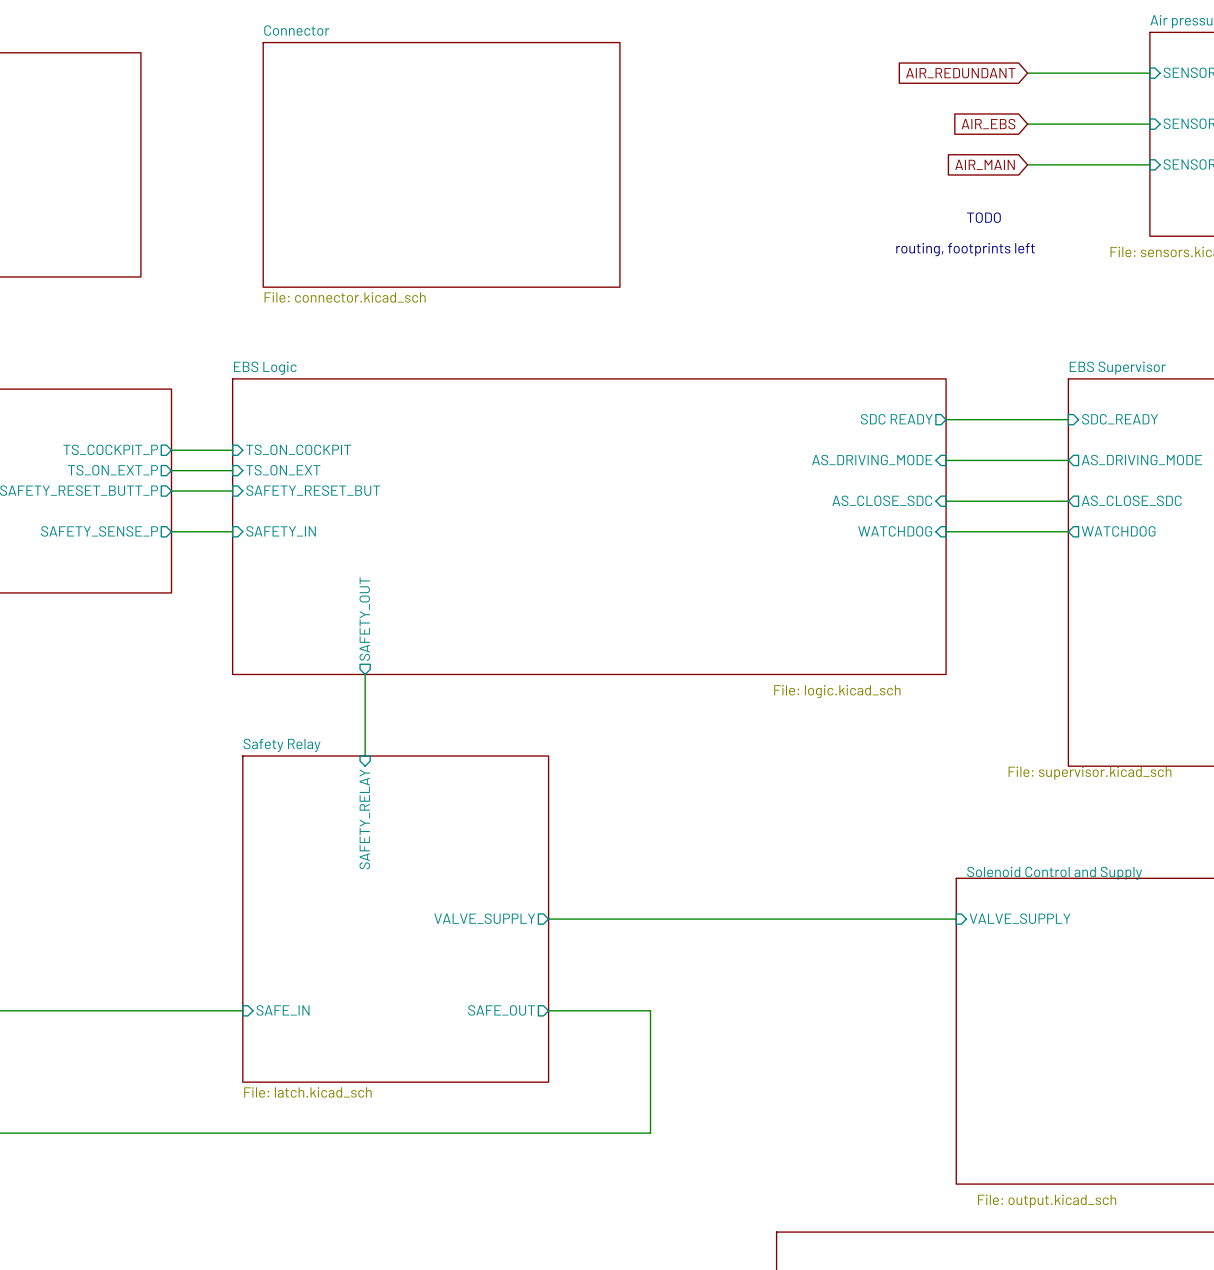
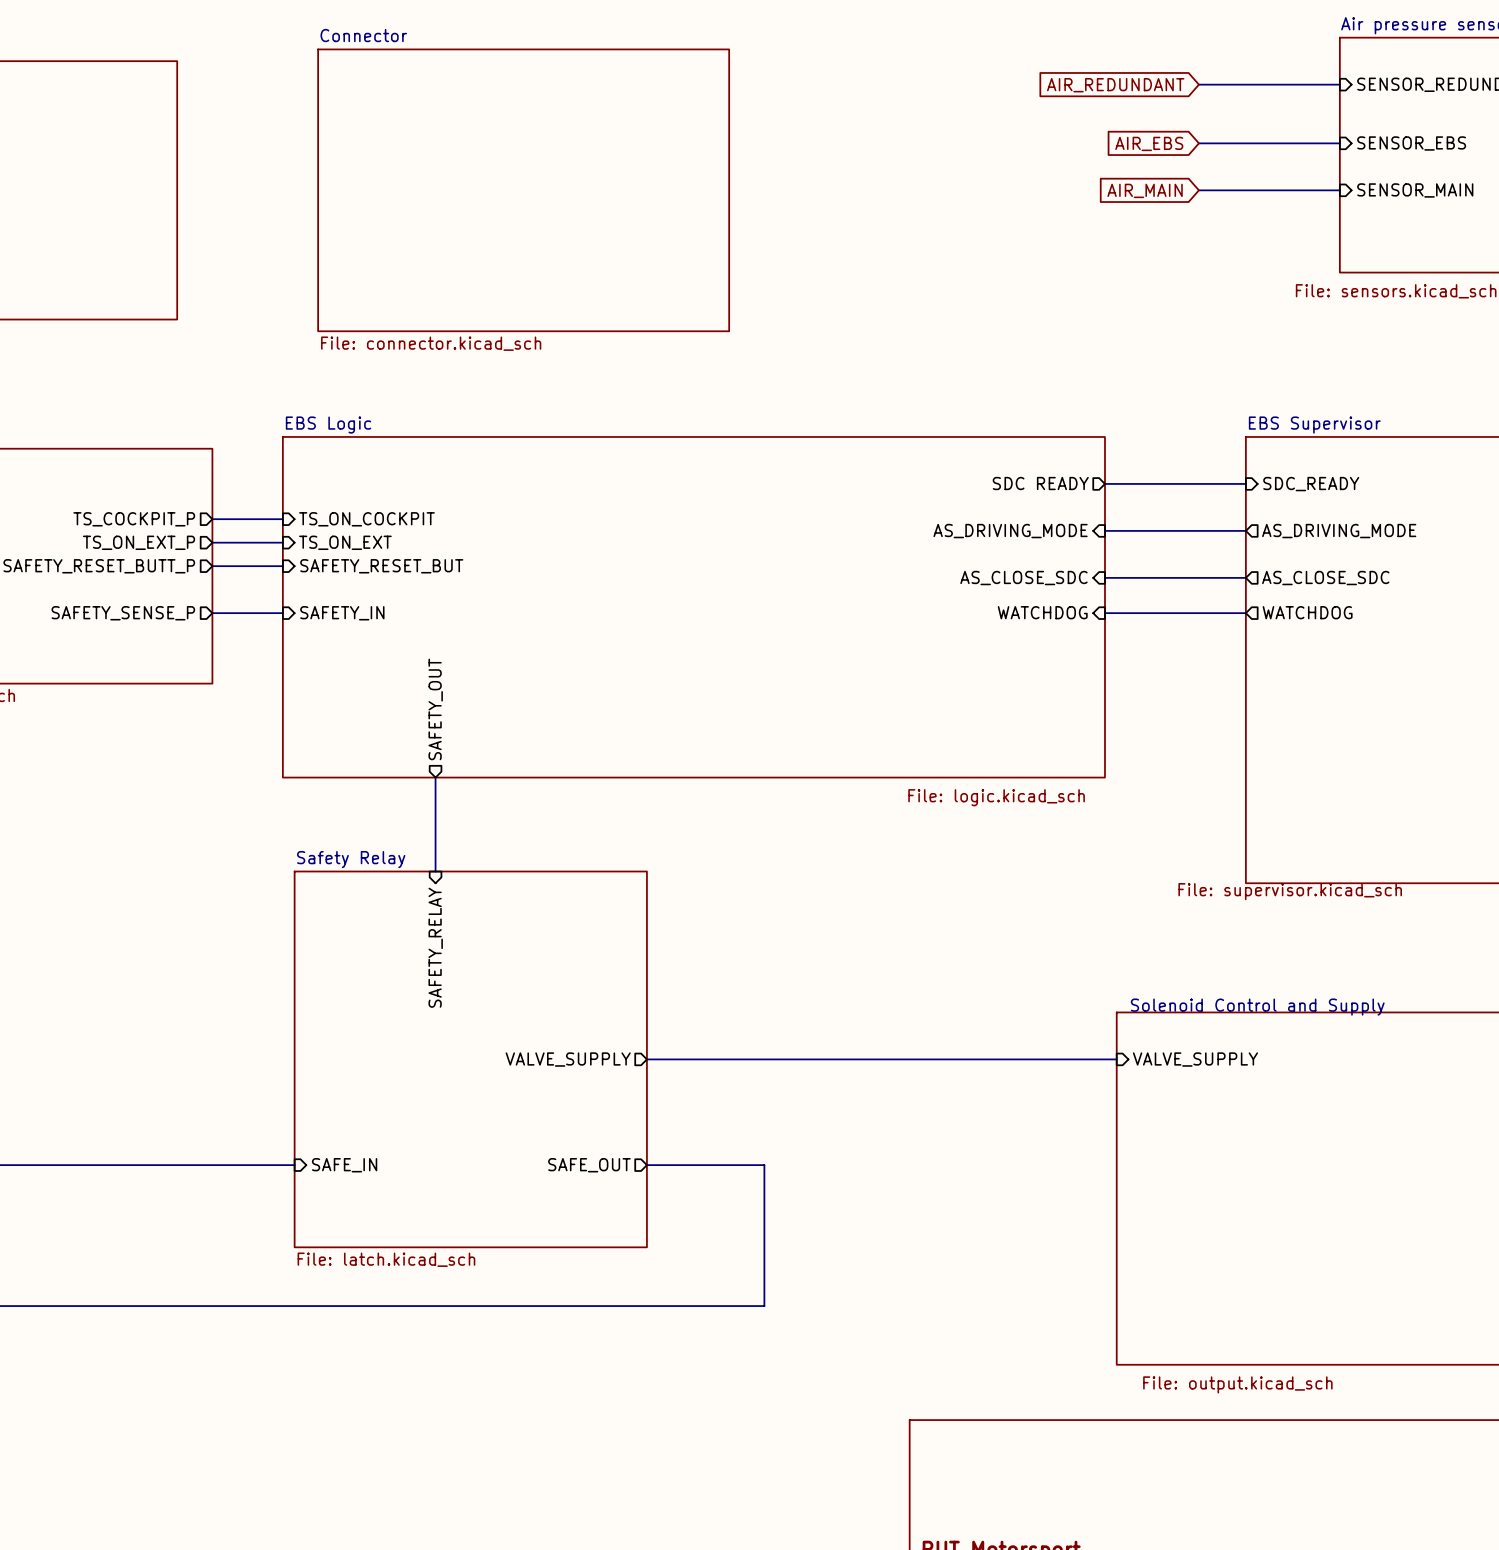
text: TODO (983, 217) -> none
text: routing, footprints left (965, 249) -> none

